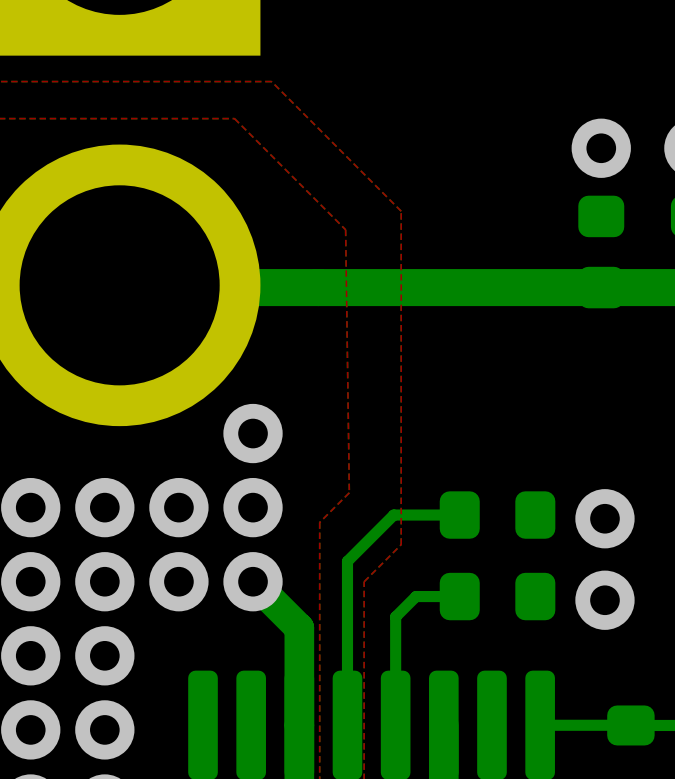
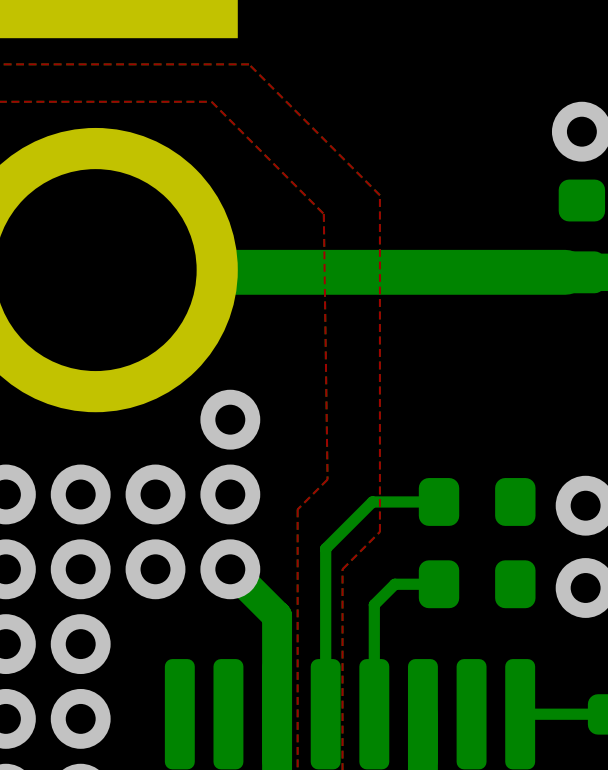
bottom track width: thin (119, 285) (121, 287) (584, 287) -> thick (95, 270) (97, 272) (565, 272)

